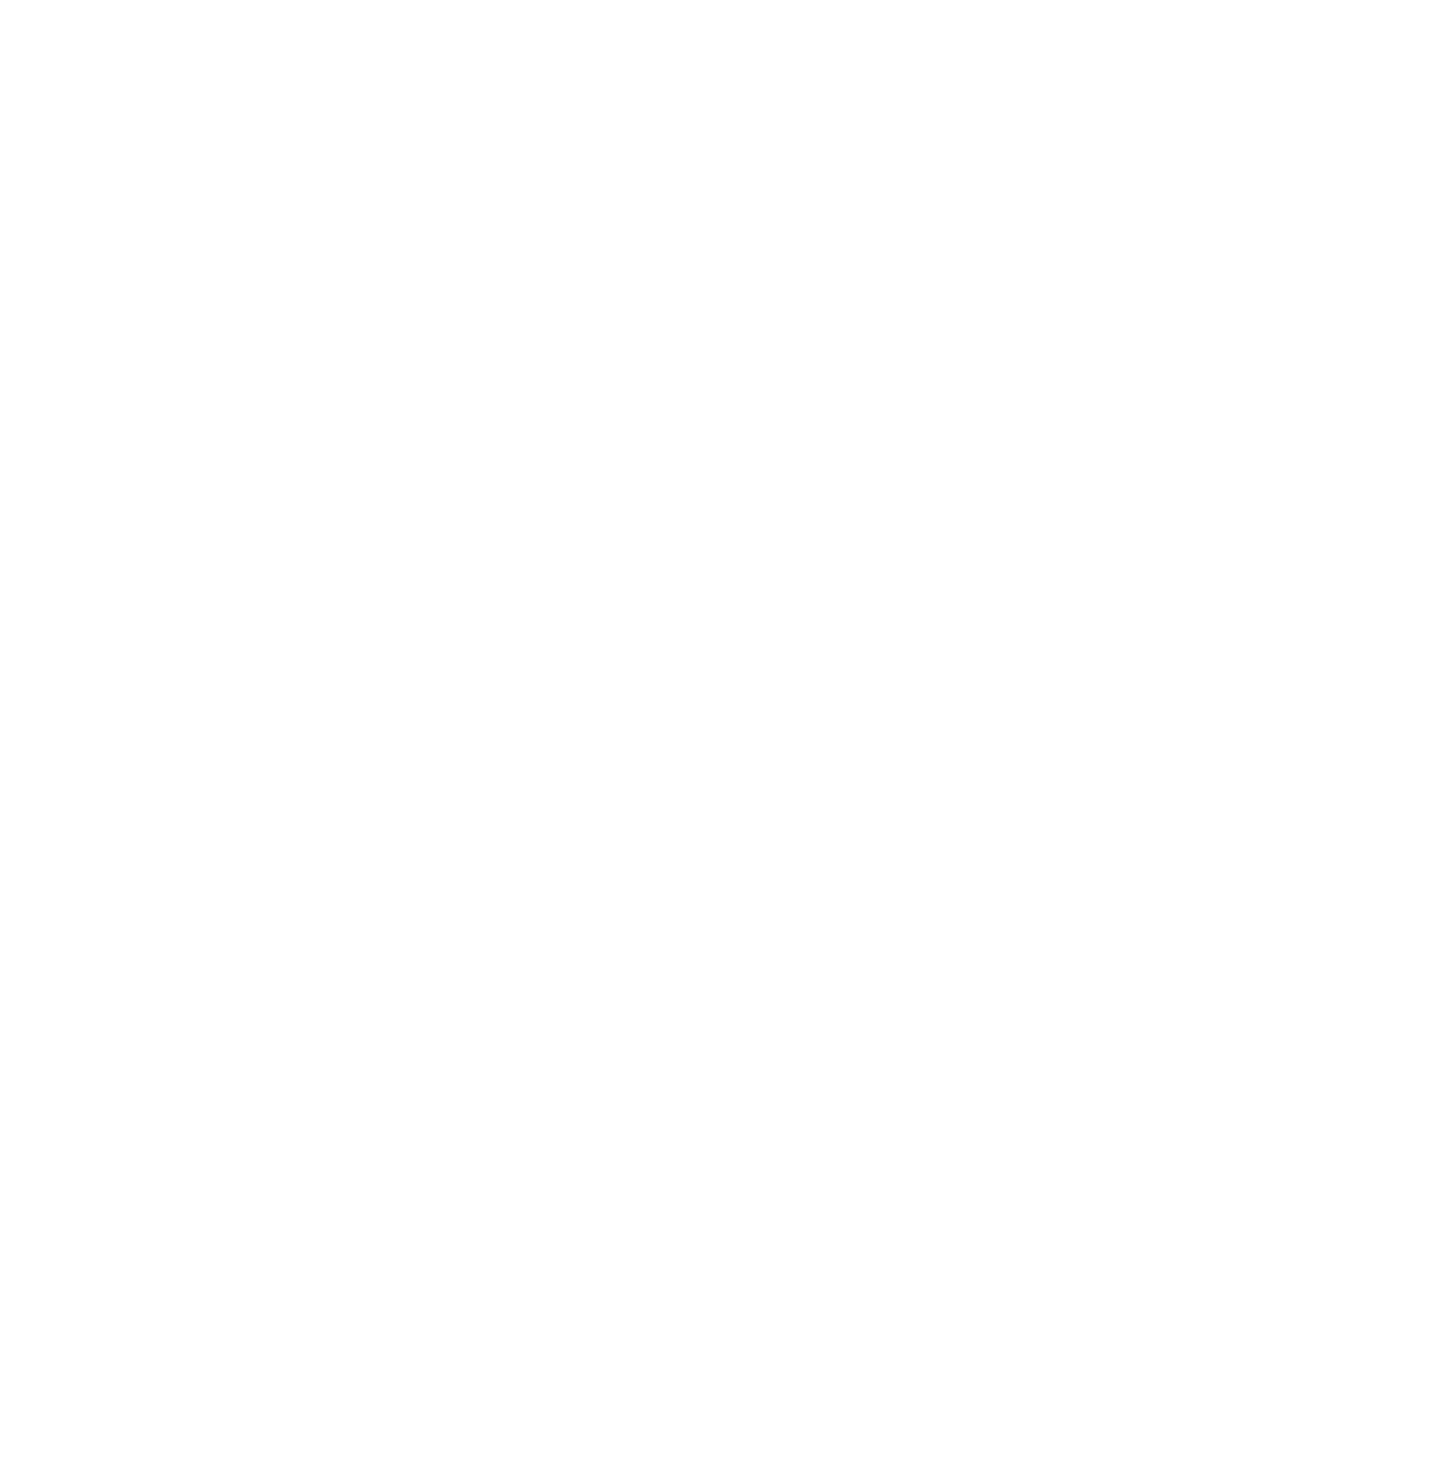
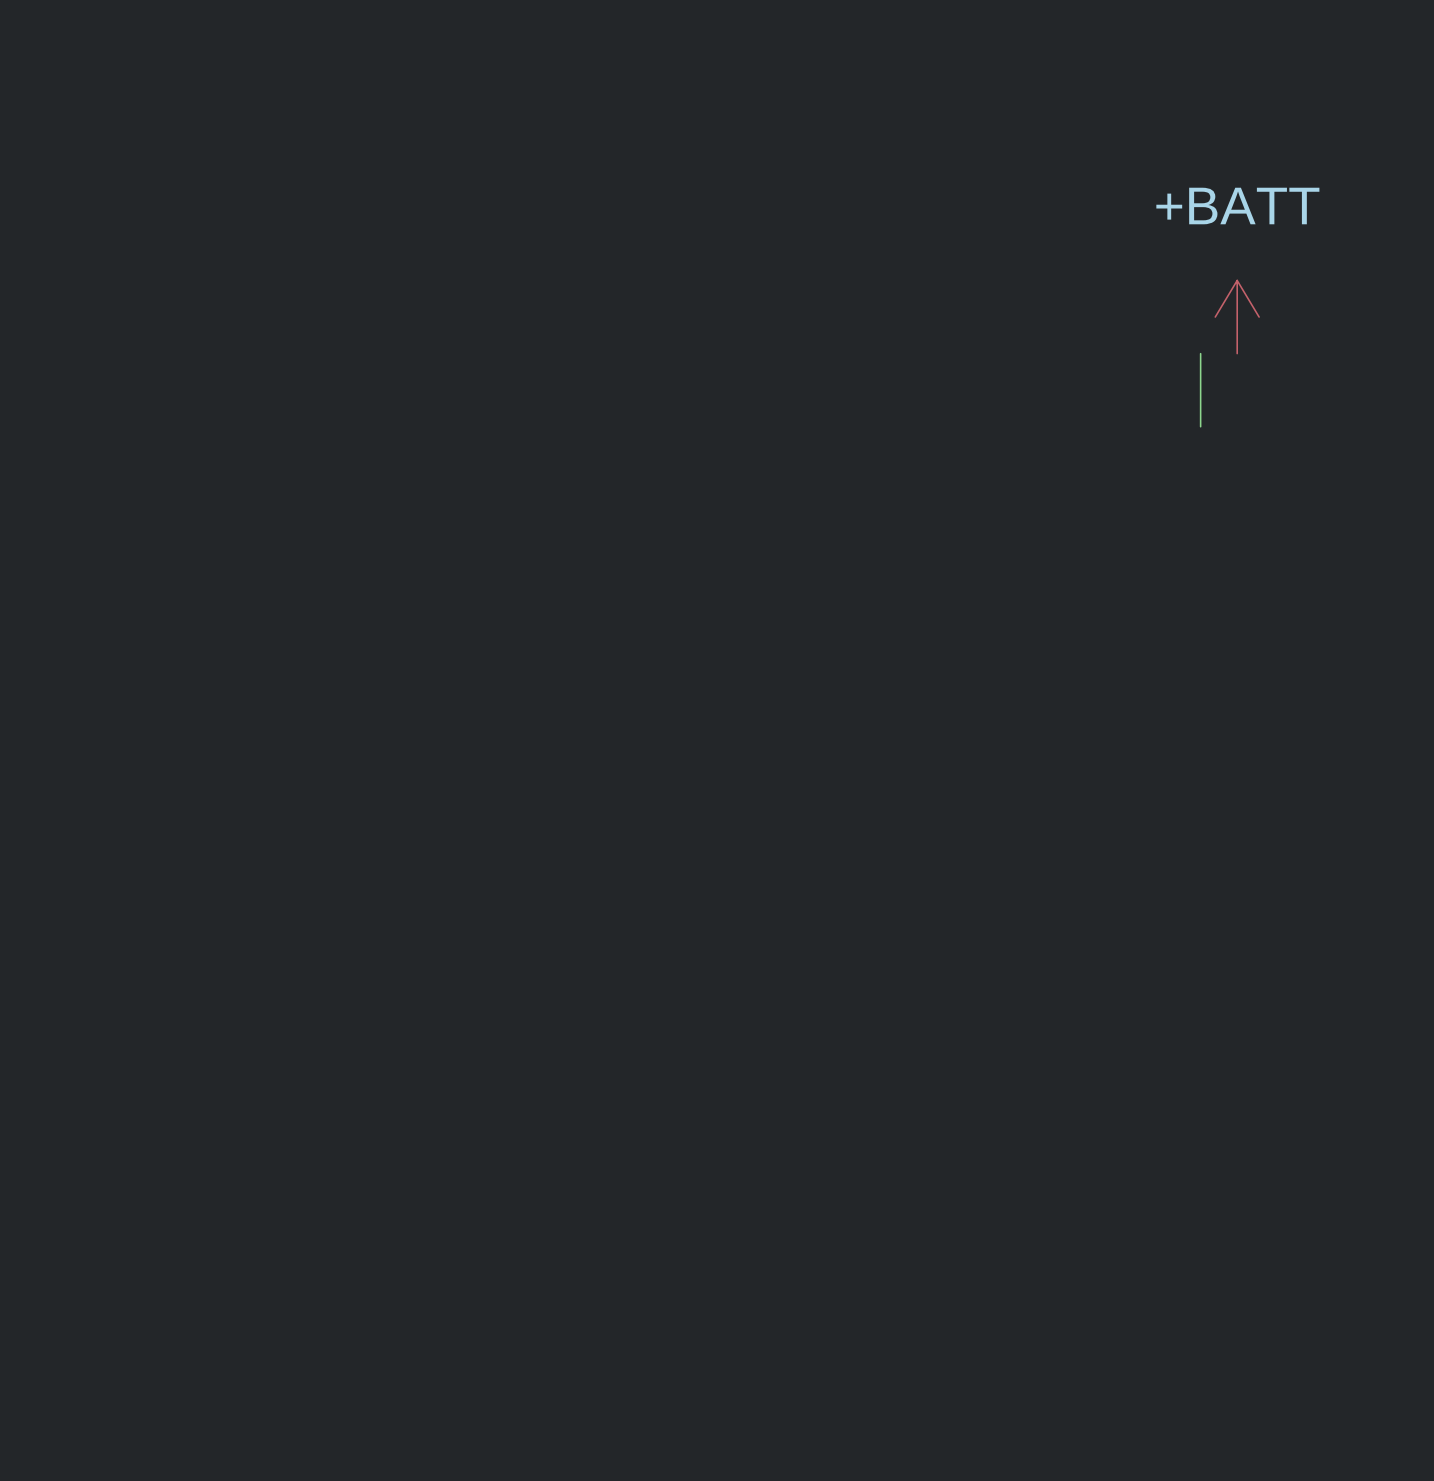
power symbol: none -> +BATT (1237, 317)
wire: none -> (1200, 353) (1200, 426)

